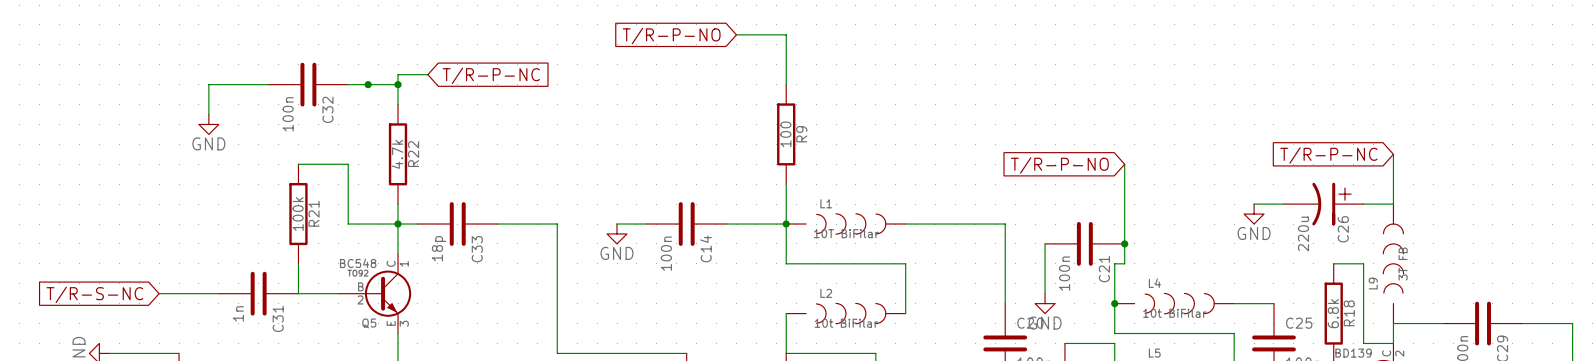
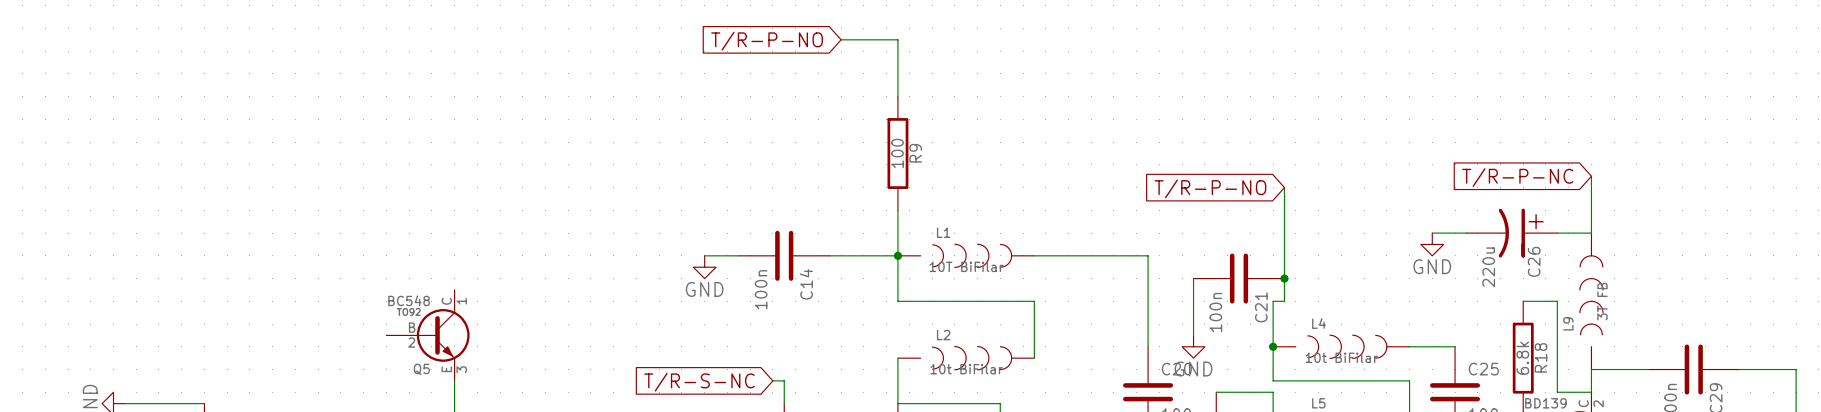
wire: (427, 74) (398, 74) (398, 104) -> none
global label: T/R-P-NC (491, 75) -> none
wire: (268, 84) (208, 84) (208, 114) -> none
C32: 100n (308, 84) -> none
wire: (348, 84) (398, 84) -> none
junction: (368, 84) -> none
junction: (398, 84) -> none
power symbol: GND (208, 124) -> none
R22: 4.7k (398, 154) -> none
wire: (298, 164) (348, 164) (348, 224) (417, 224) -> none
wire: (398, 204) (398, 253) -> none
R21: 100k (298, 214) -> none
junction: (398, 224) -> none
C33: 18p (457, 224) -> none
wire: (497, 224) (557, 224) (557, 353) (686, 353) -> (772, 380) (784, 380) (784, 403)
wire: (298, 263) (298, 293) (338, 293) -> none
wire: (159, 293) (218, 293) -> none
C31: 1n (258, 293) -> none
global label: T/R-S-NC (94, 294) -> none
global label: none -> T/R-S-NC (699, 382)

